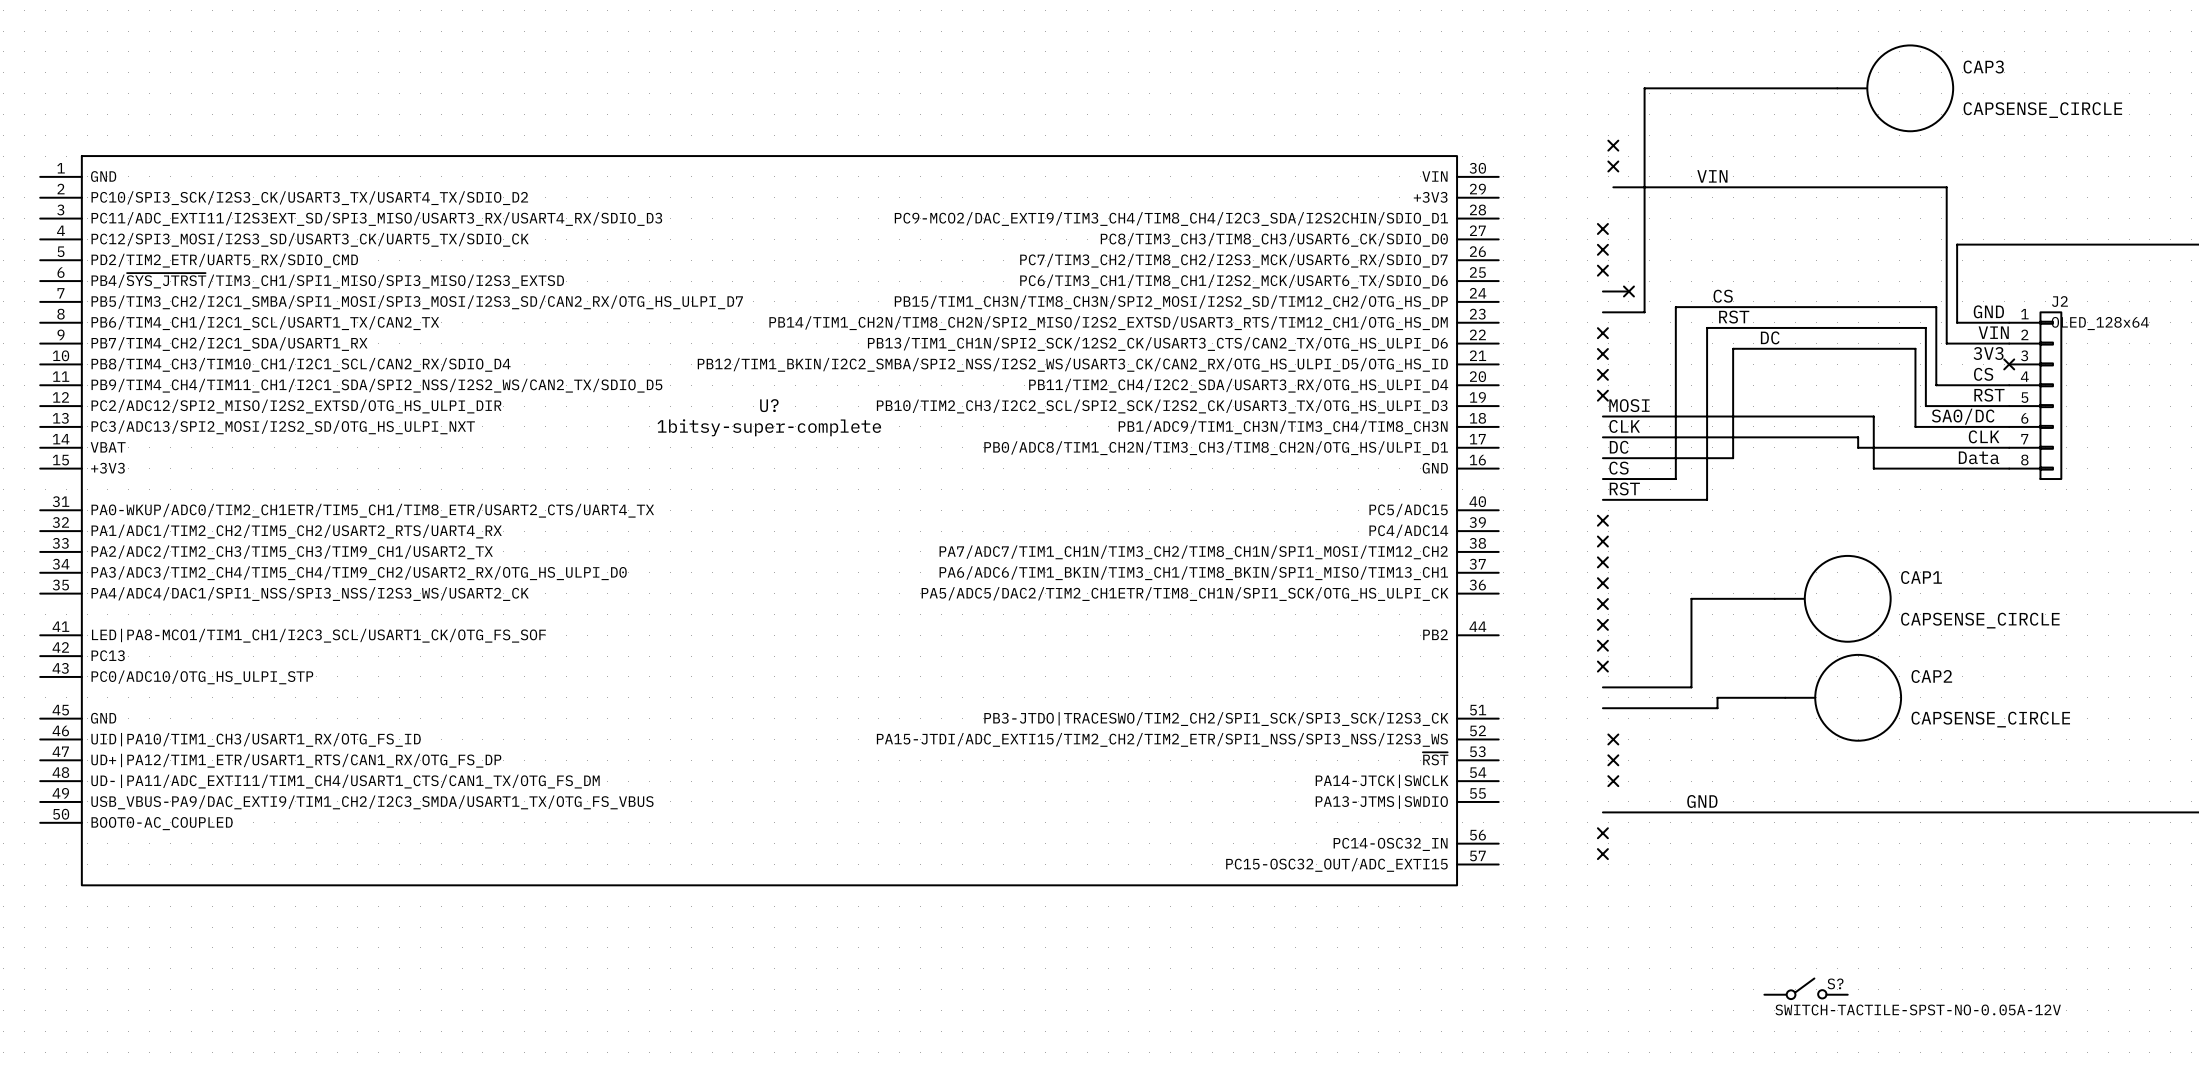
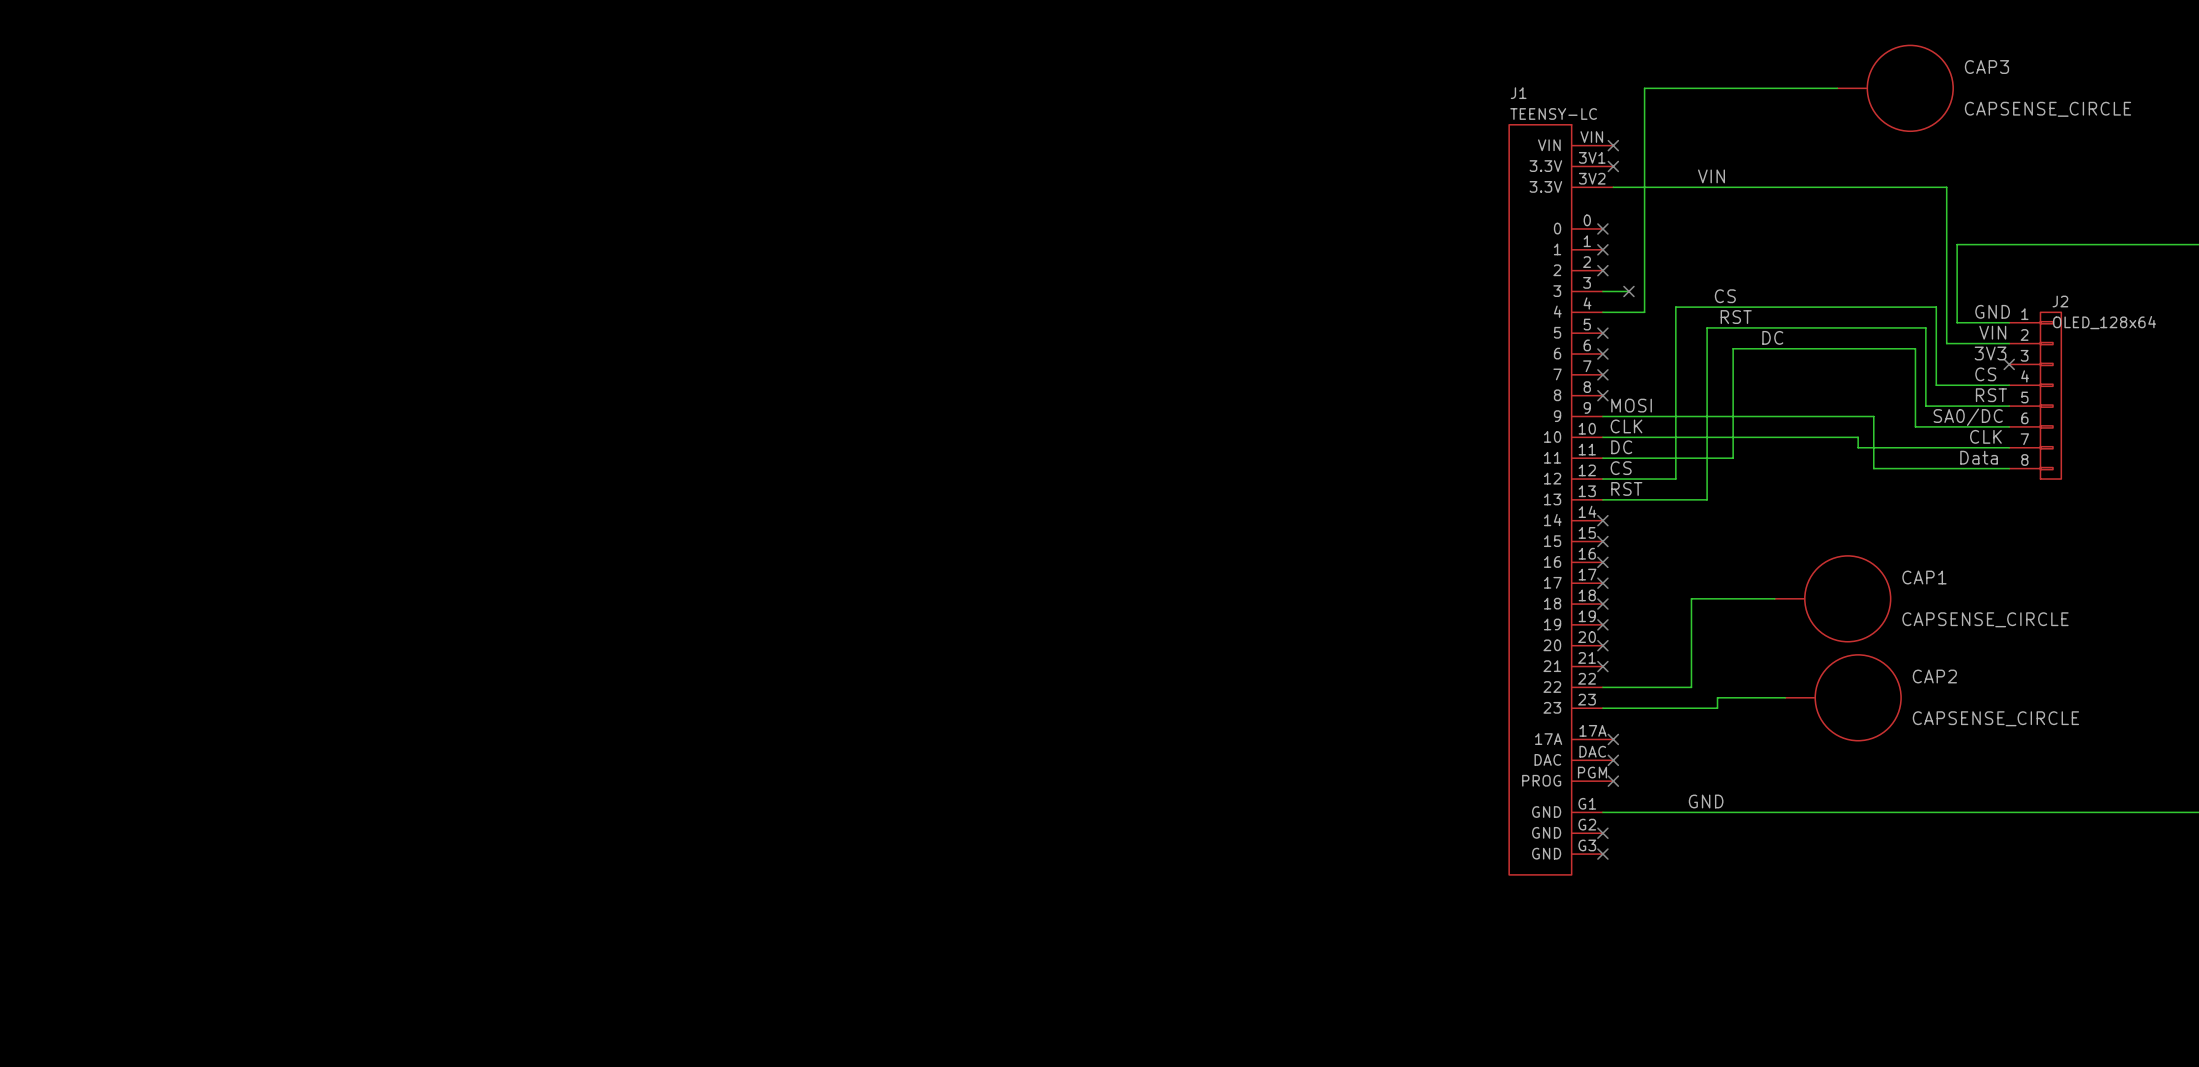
J1: none -> TEENSY-LC (1561, 499)
U?: 1bitsy-super-complete (769, 520) -> none
S?: SWITCH-TACTILE-SPST-NO-0.05A-12V (1806, 988) -> none

